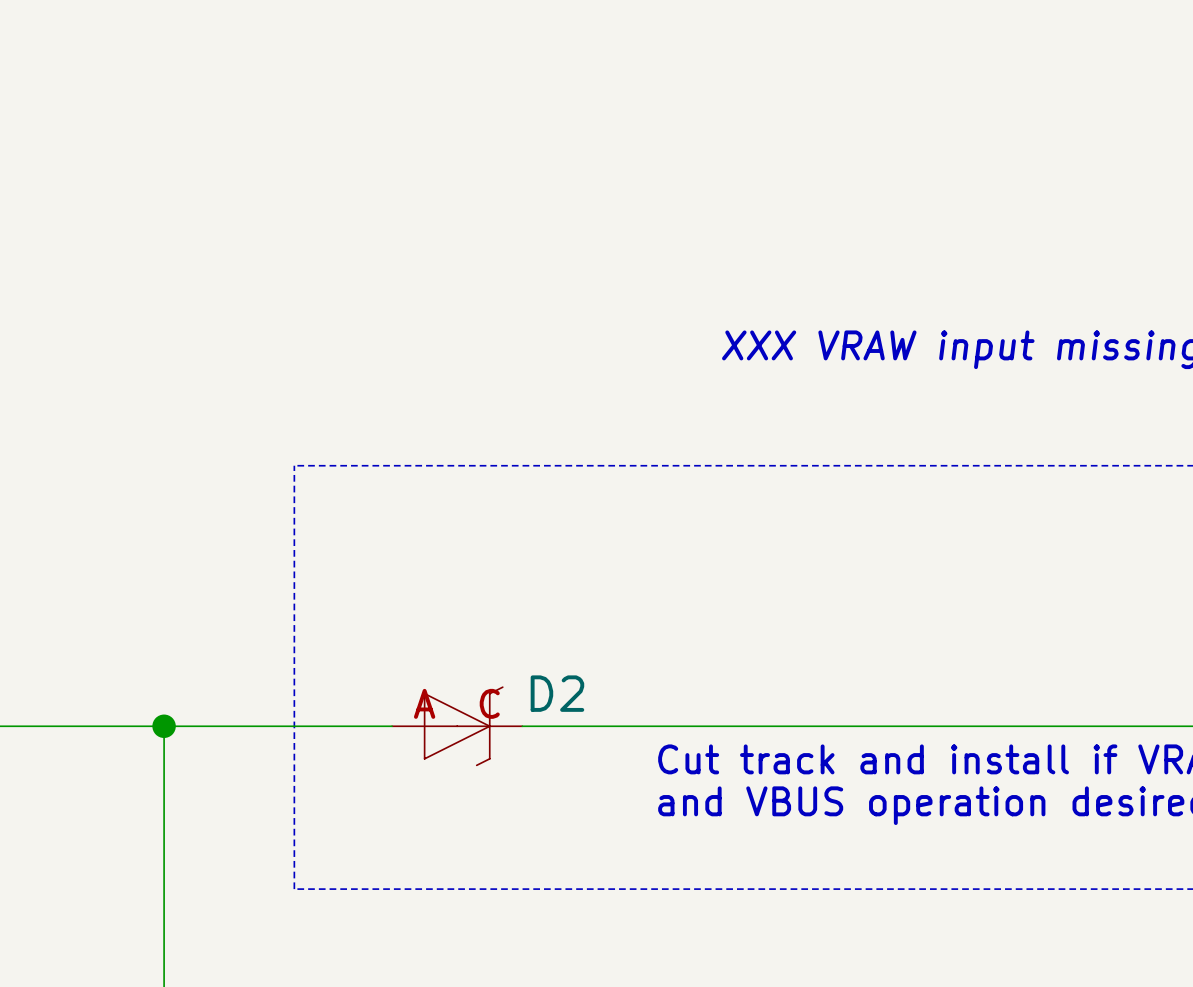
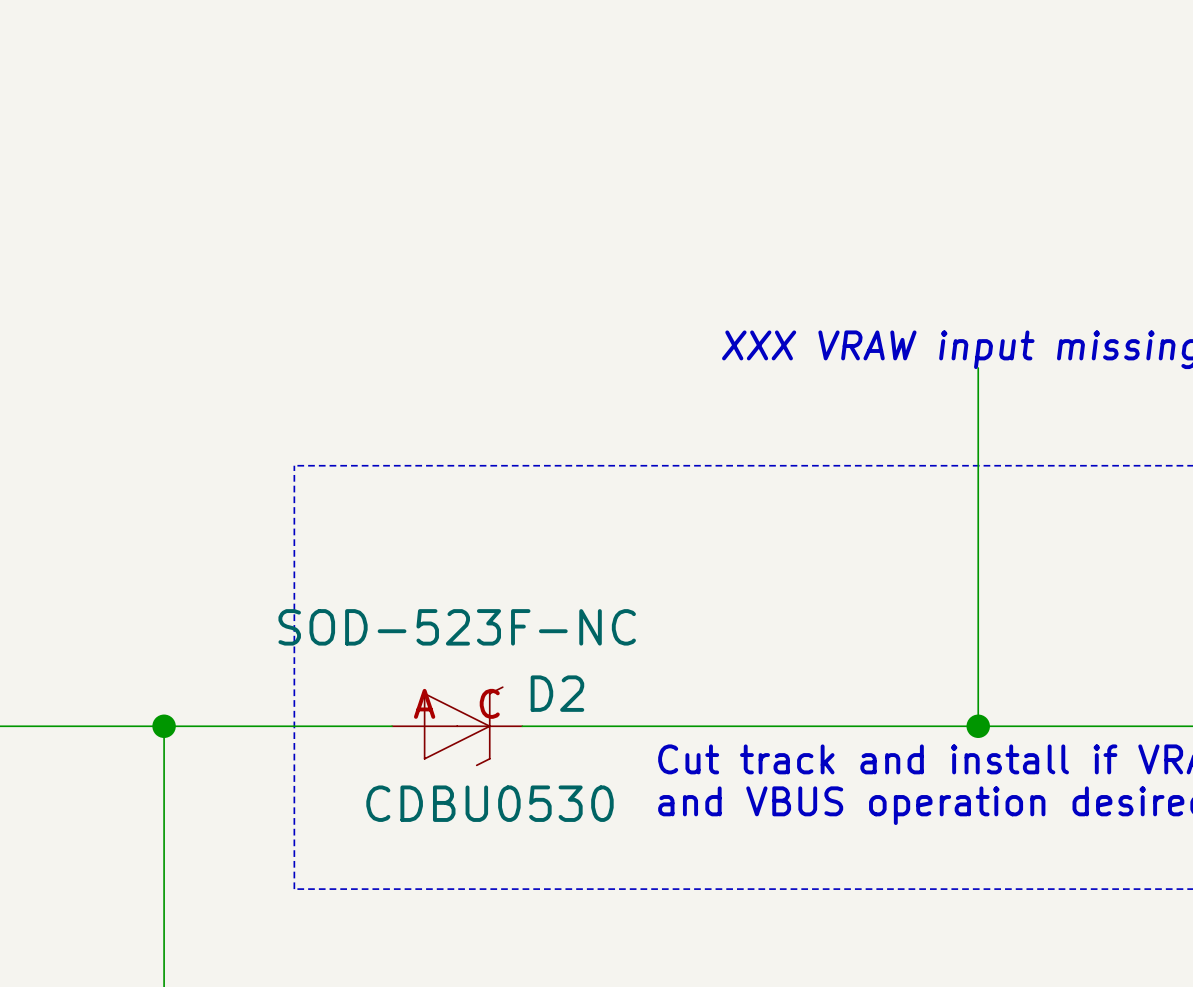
wire: none -> (978, 368) (978, 726)
D2 text: none -> SOD-523F-NC (457, 627)
junction: none -> (978, 726)
D2 value: none -> CDBU0530 (489, 803)

